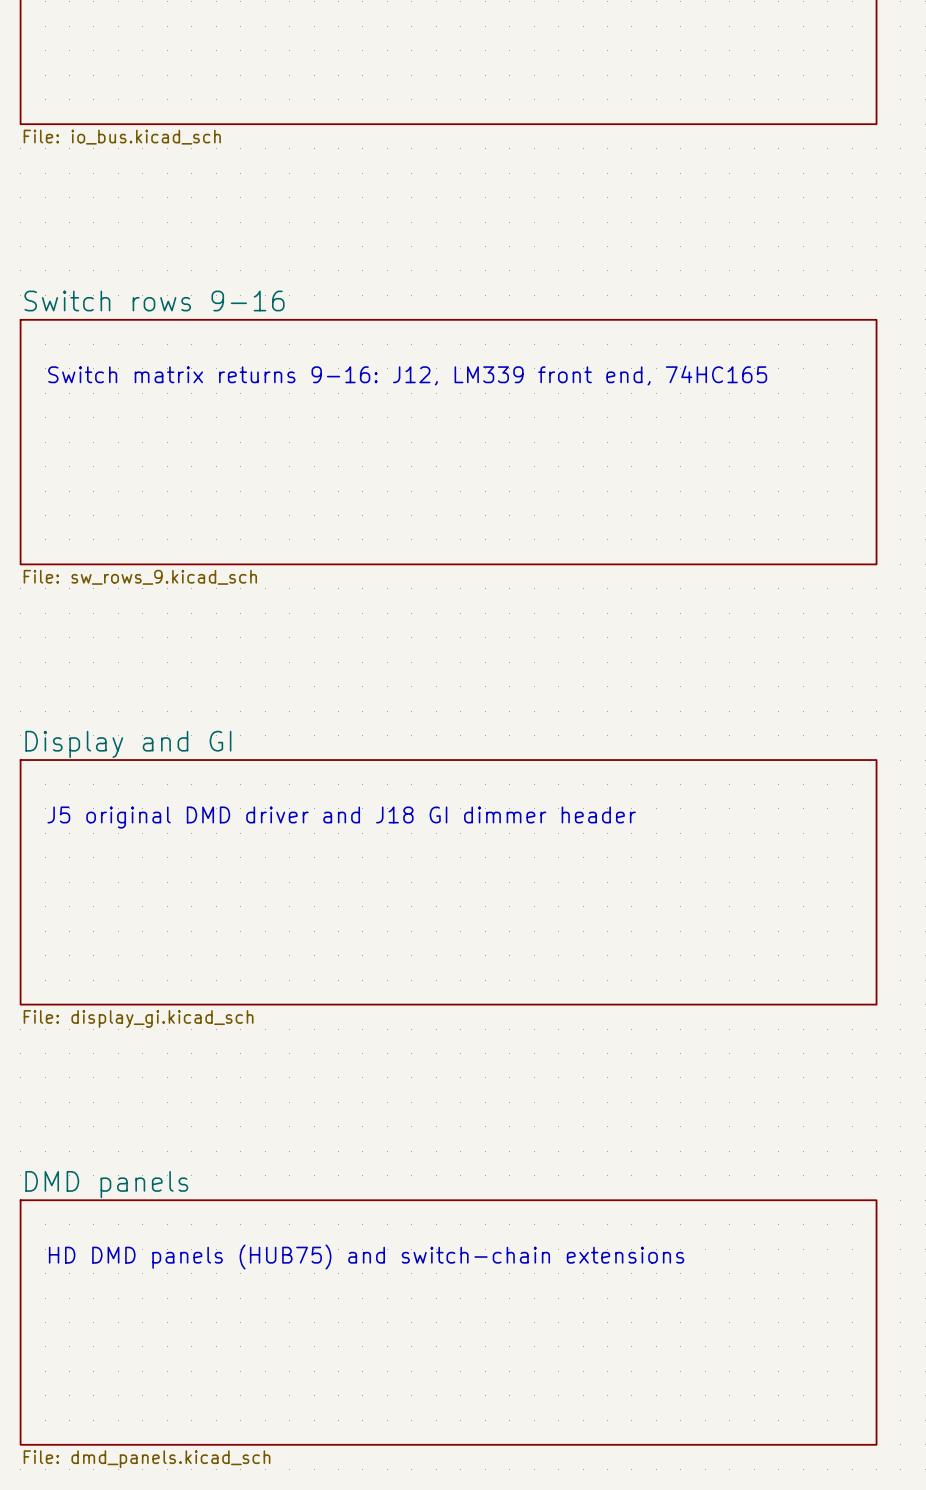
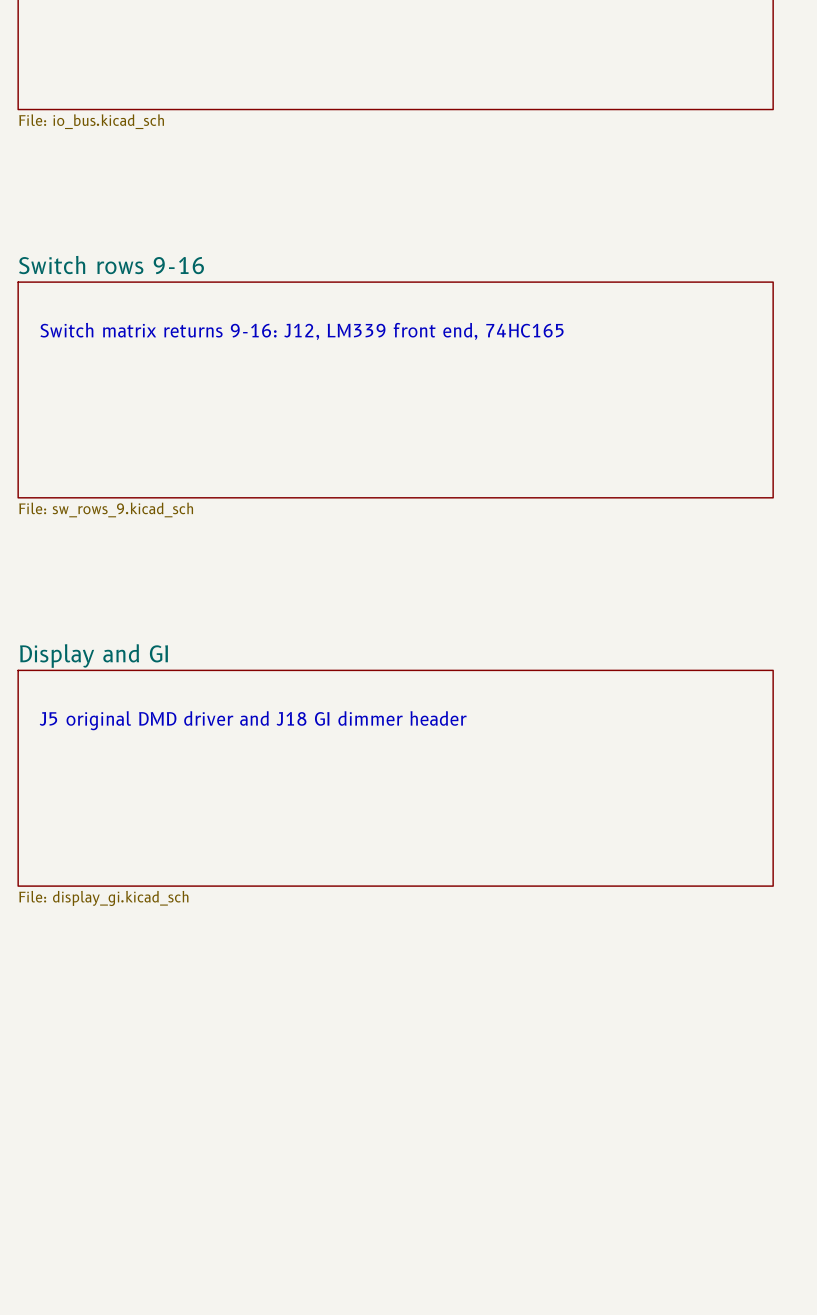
text: HD DMD panels (HUB75) and switch-chain extensions (366, 1257) -> none
sheet DMD panels: File: dmd_panels.kicad_sch (448, 1322) -> none

